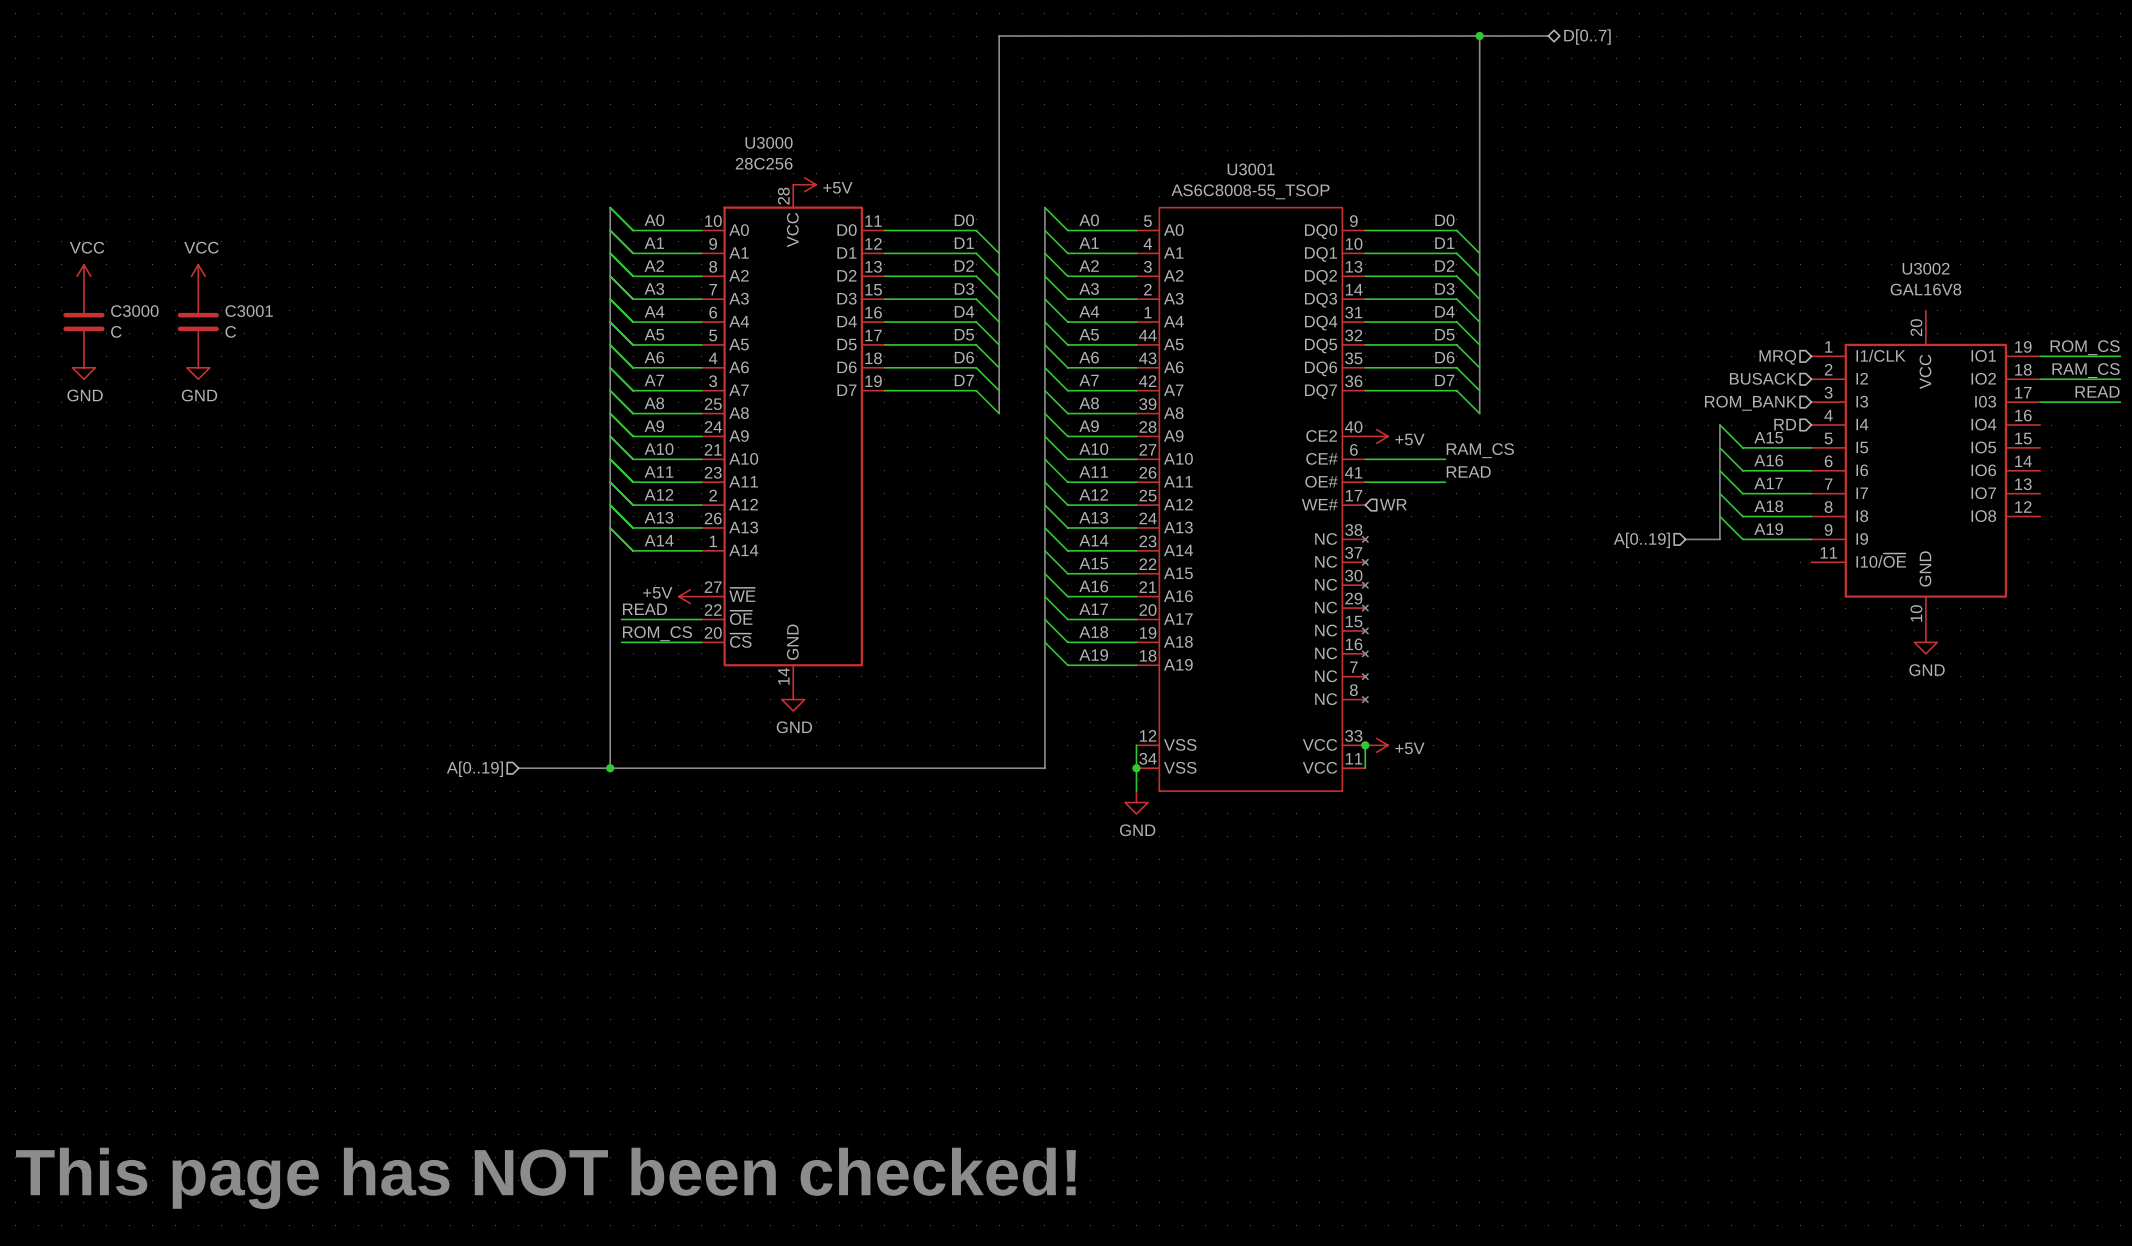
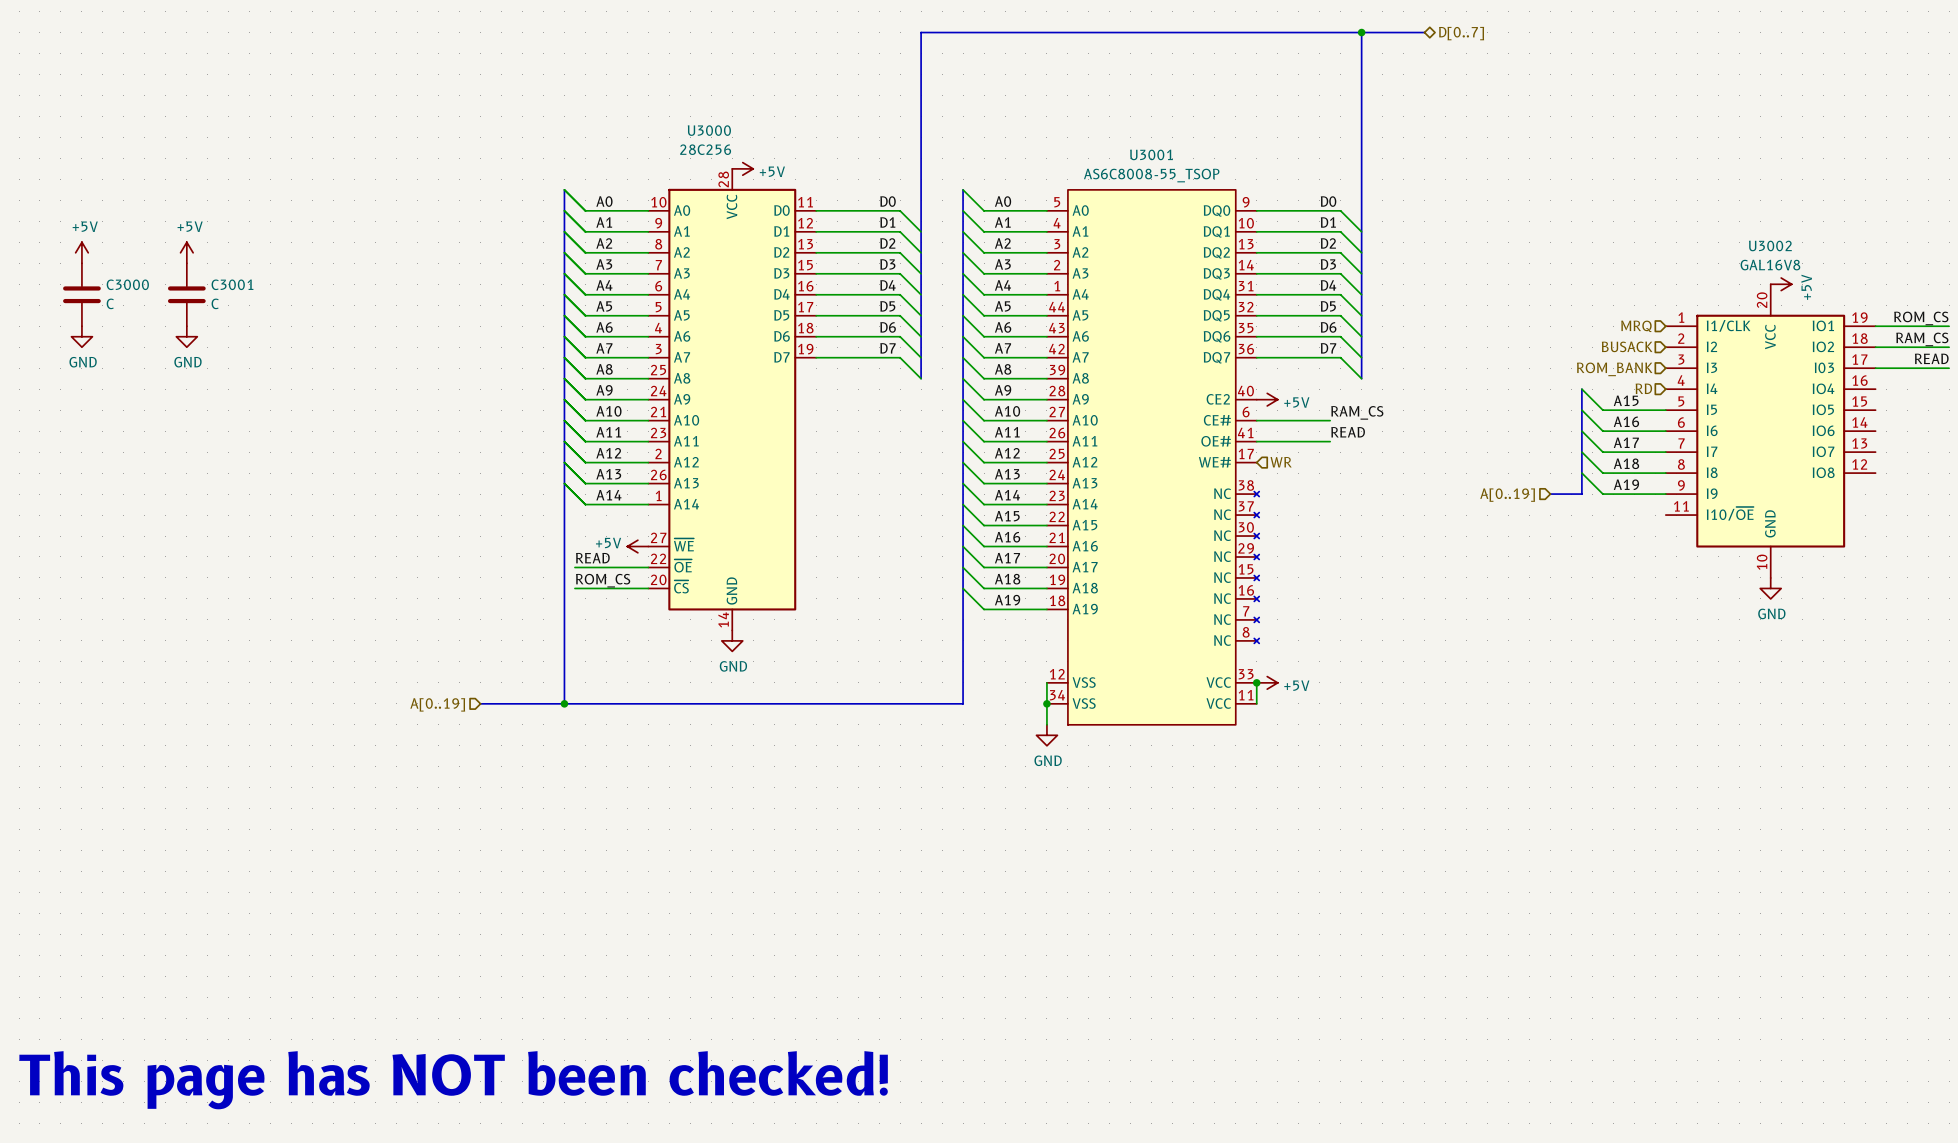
power symbol: VCC (83, 276) -> +5V (81, 252)
power symbol: VCC (198, 276) -> +5V (186, 252)
power symbol: none -> +5V (1781, 284)

